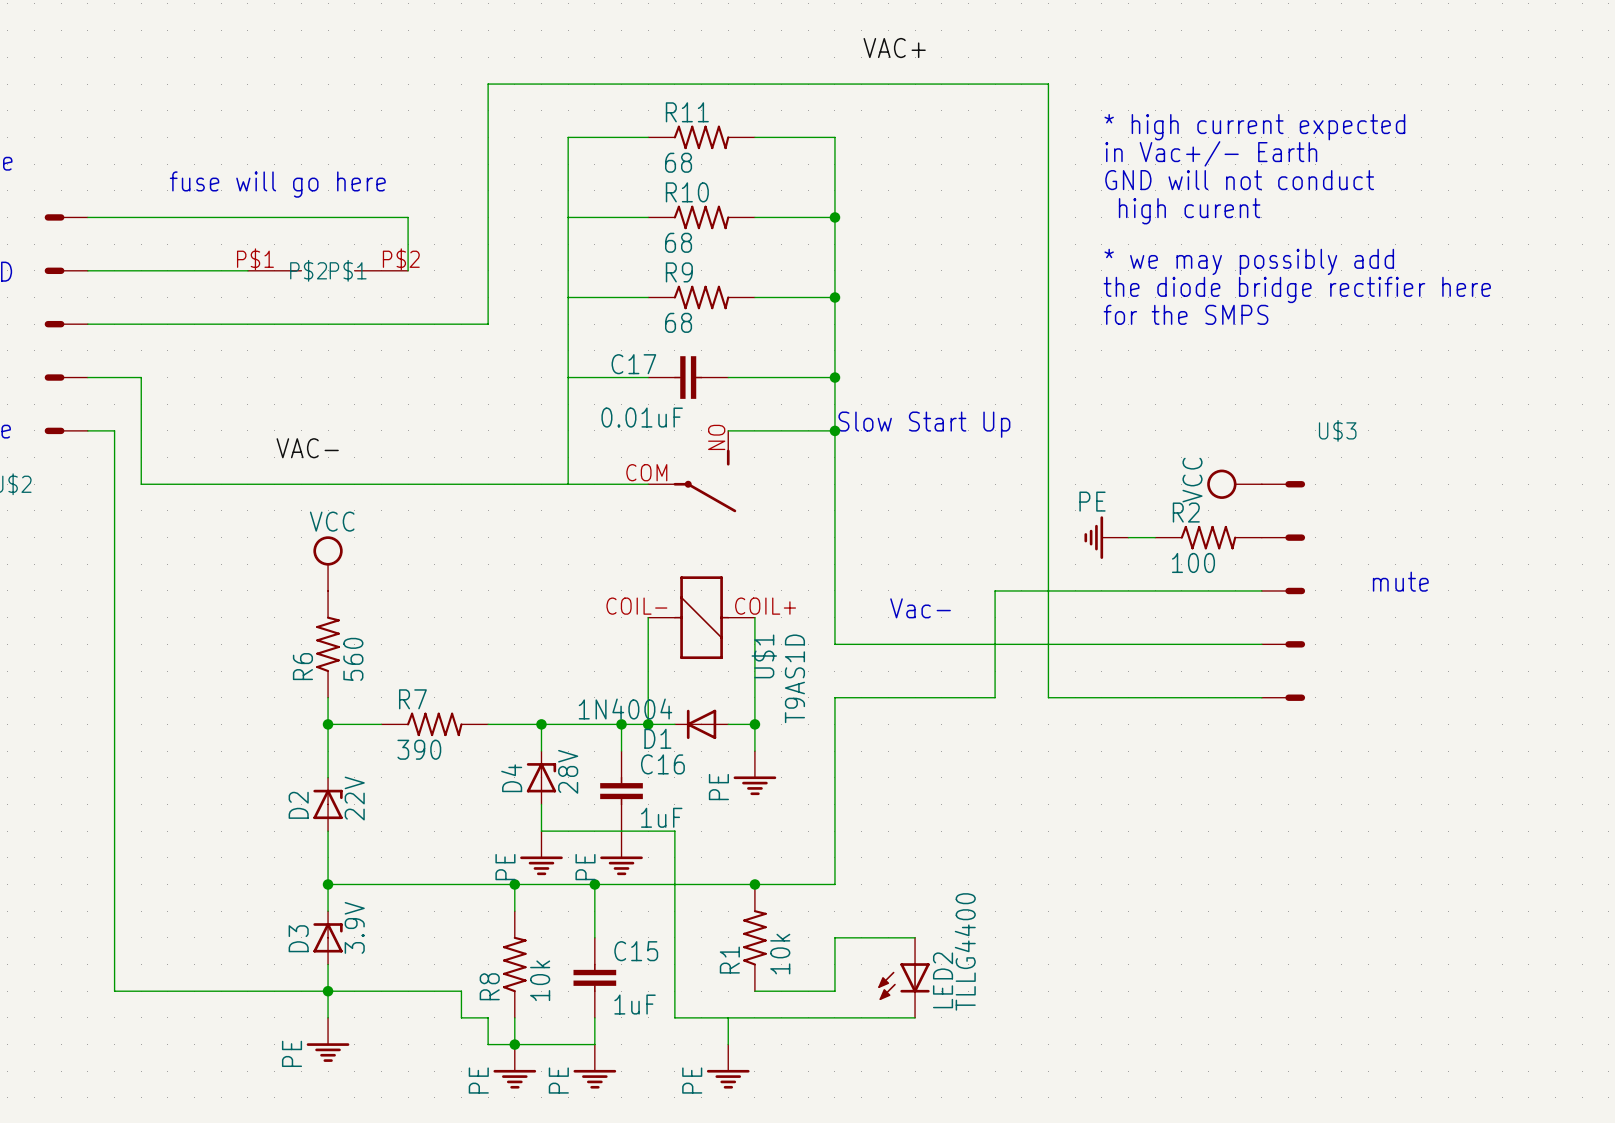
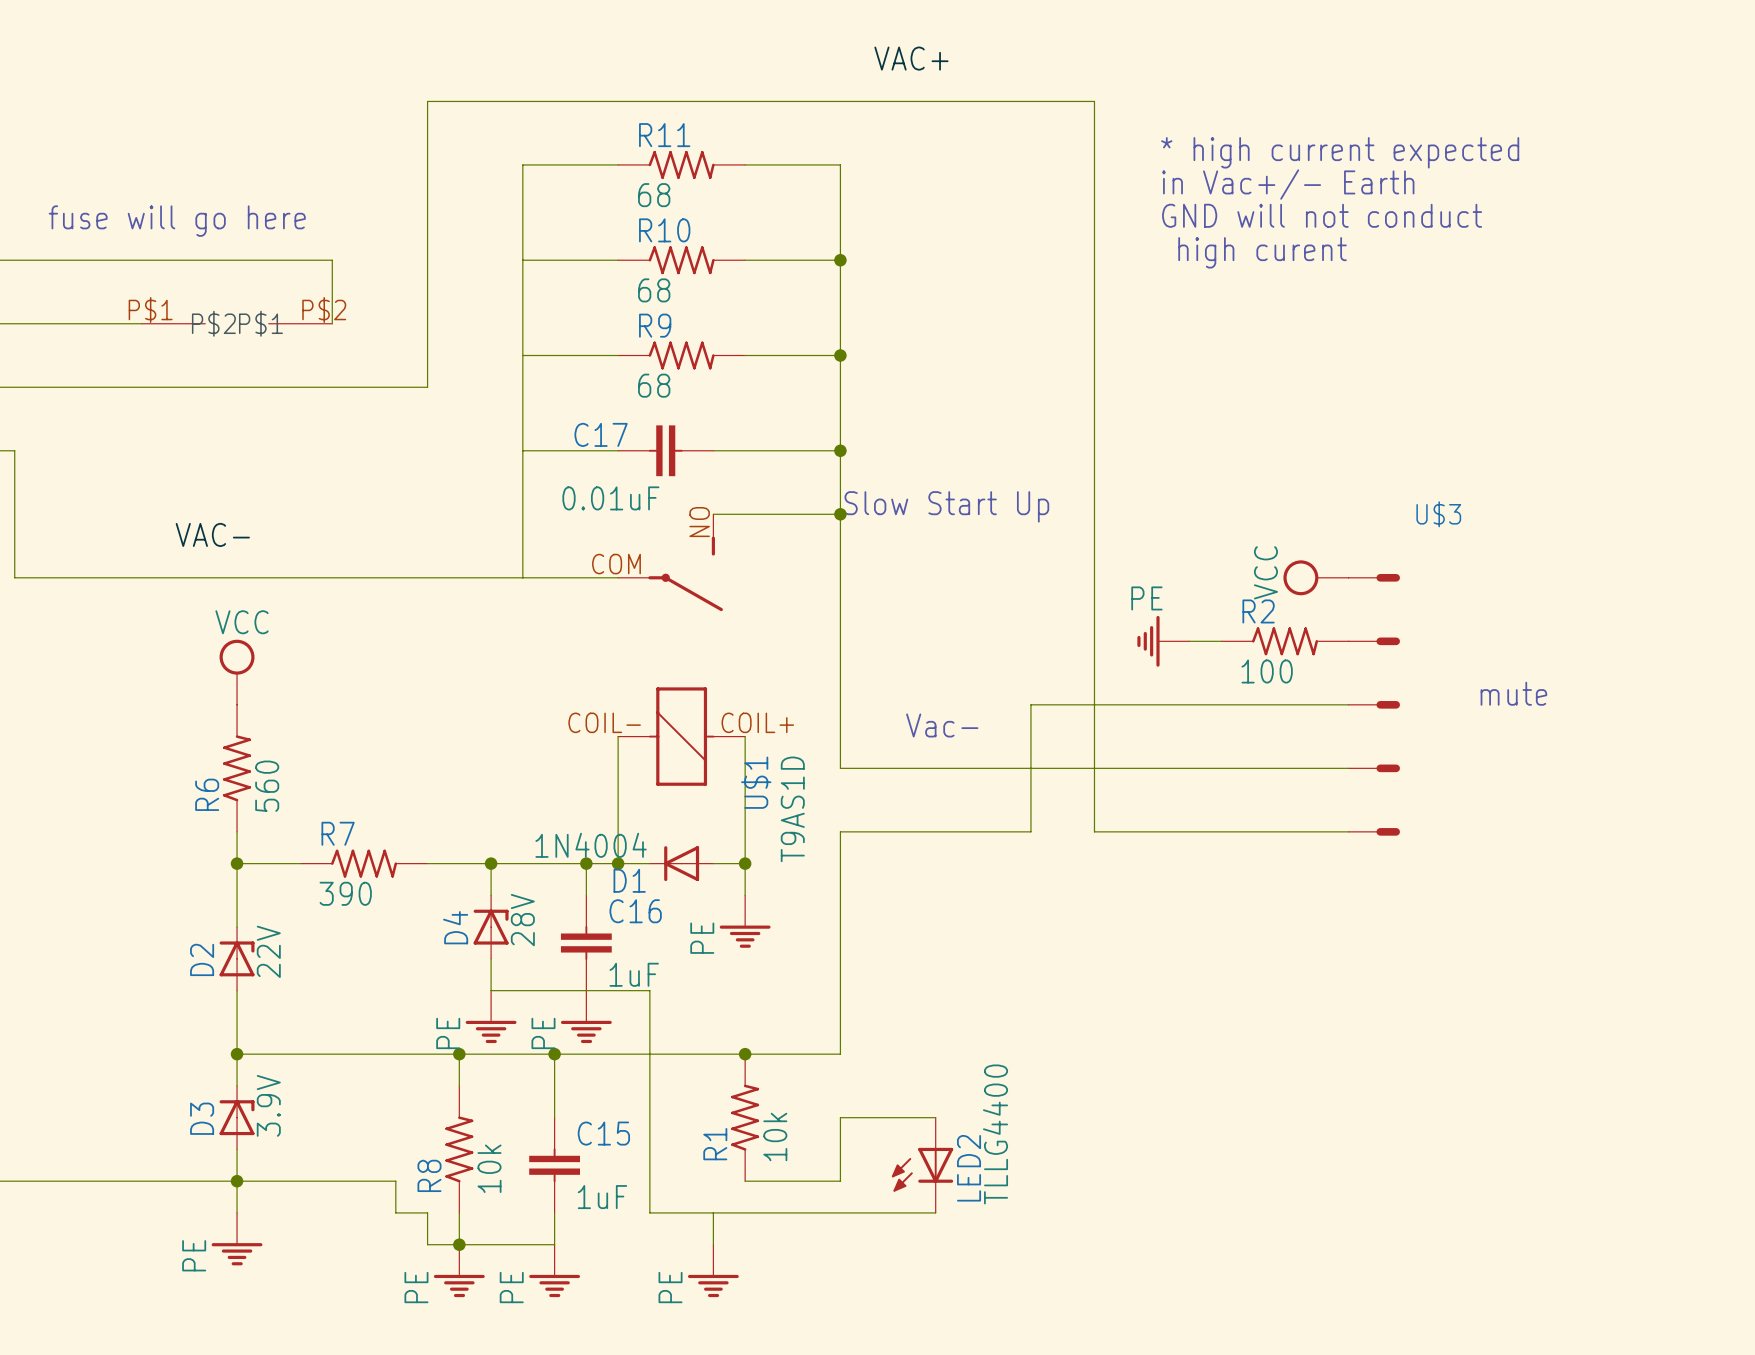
text: * we may possibly add (1249, 261) -> none
text: the diode bridge rectifier here (1297, 289) -> none
text: for the SMPS (1186, 314) -> none

